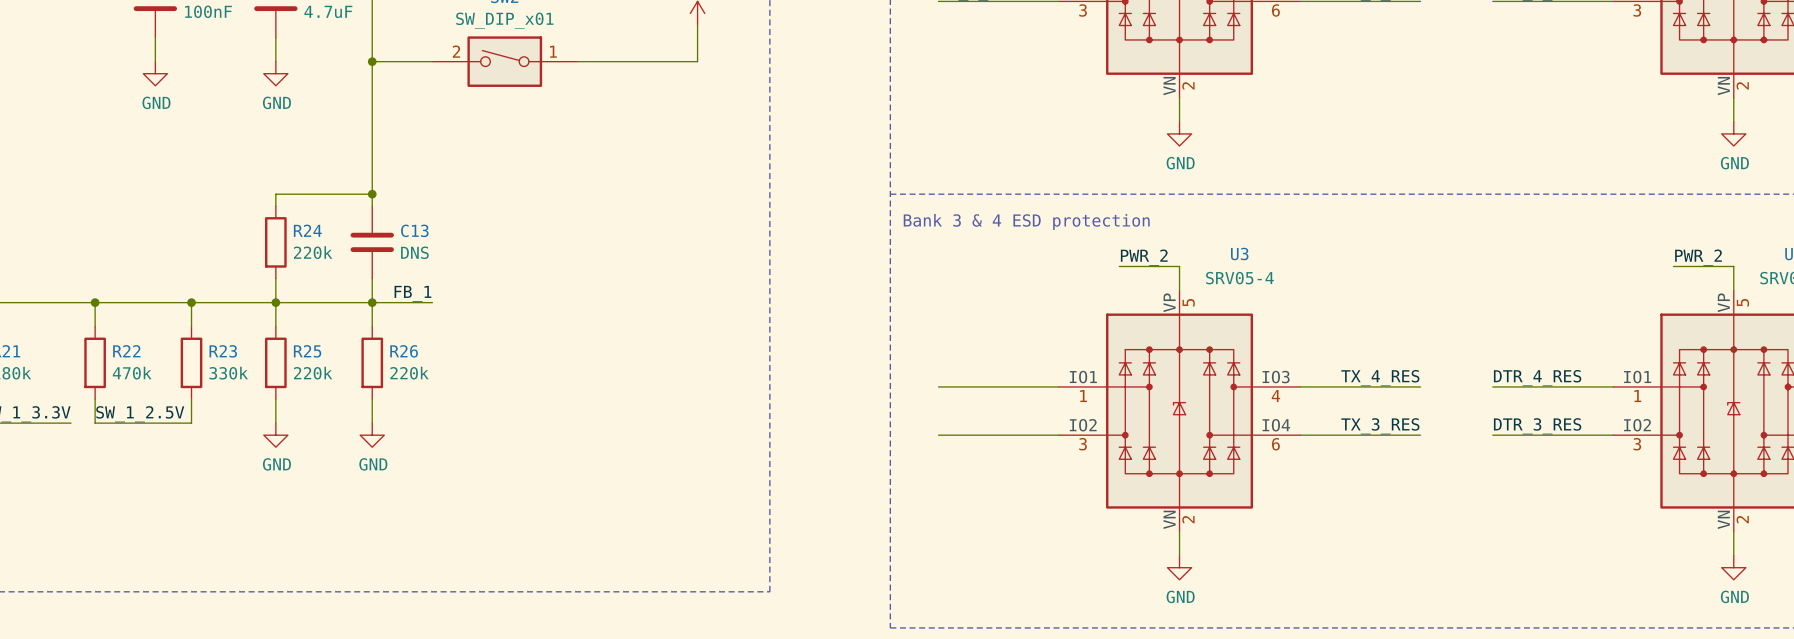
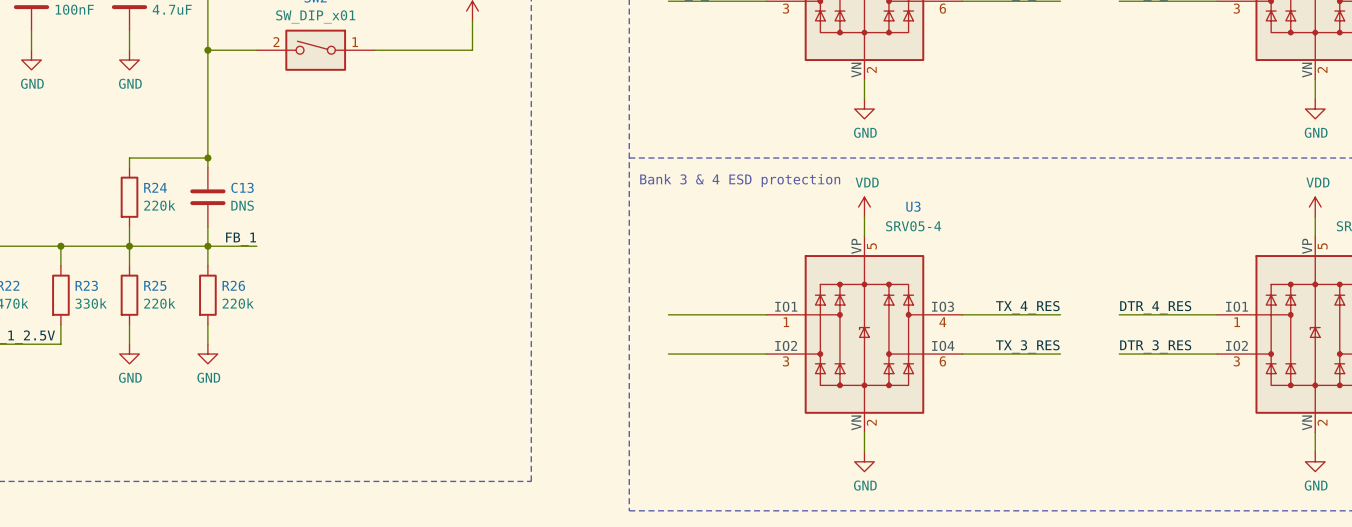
power symbol: none -> VDD (864, 207)
power symbol: none -> VDD (1315, 207)
label: PWR_2 (1144, 257) -> none
label: PWR_2 (1698, 257) -> none
wire: (1119, 266) (1179, 266) -> none
wire: (1673, 266) (1733, 266) -> none

